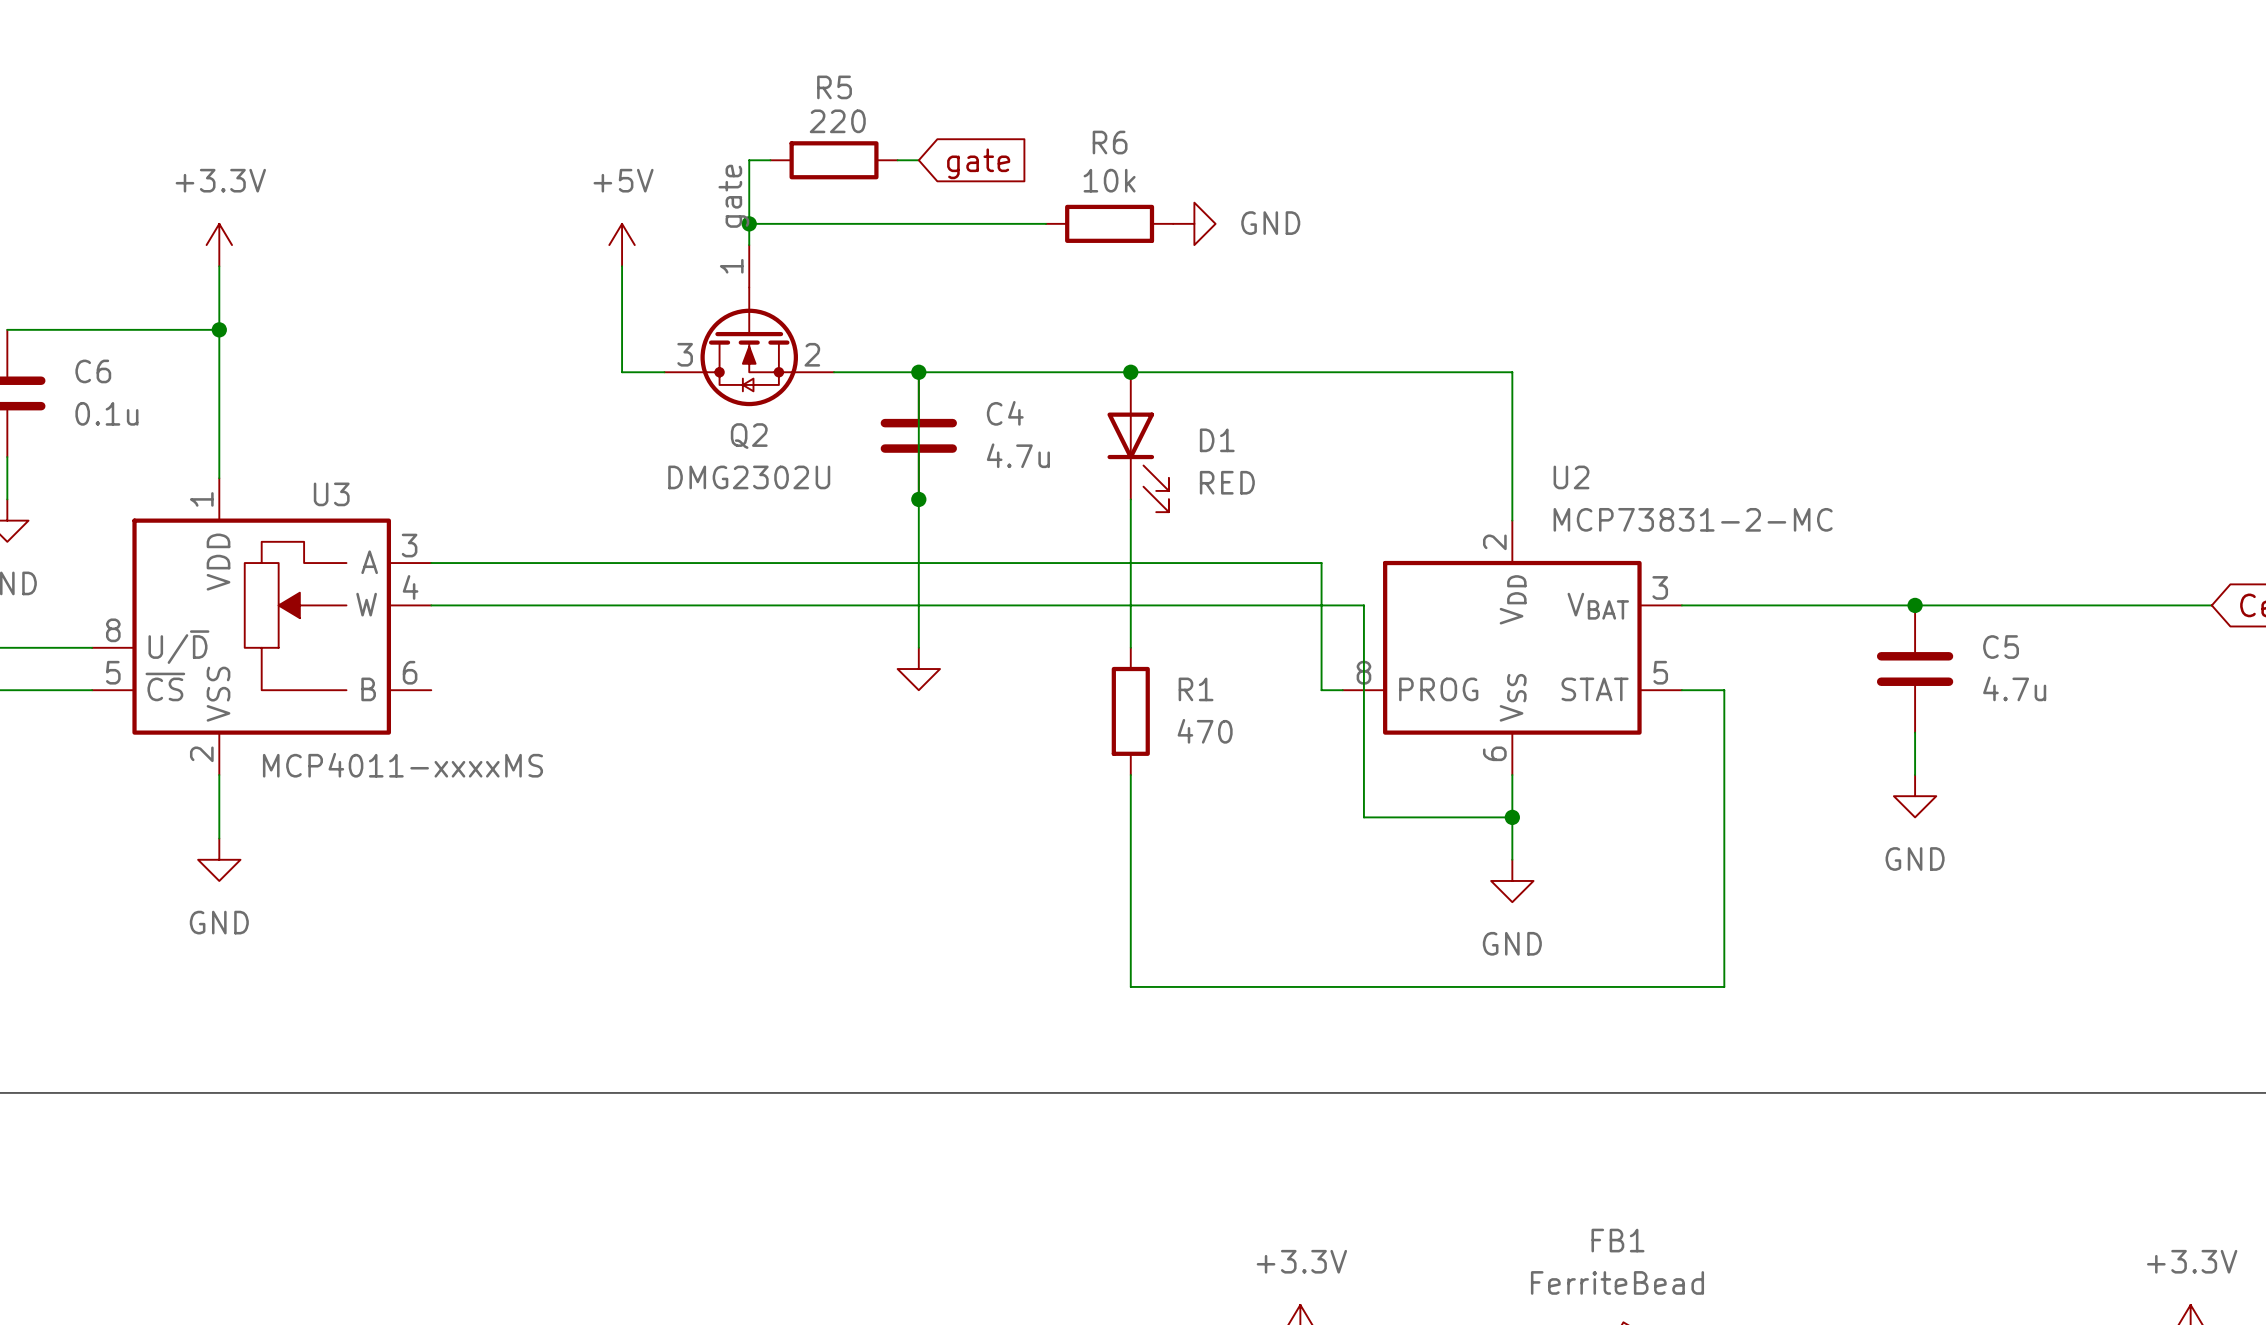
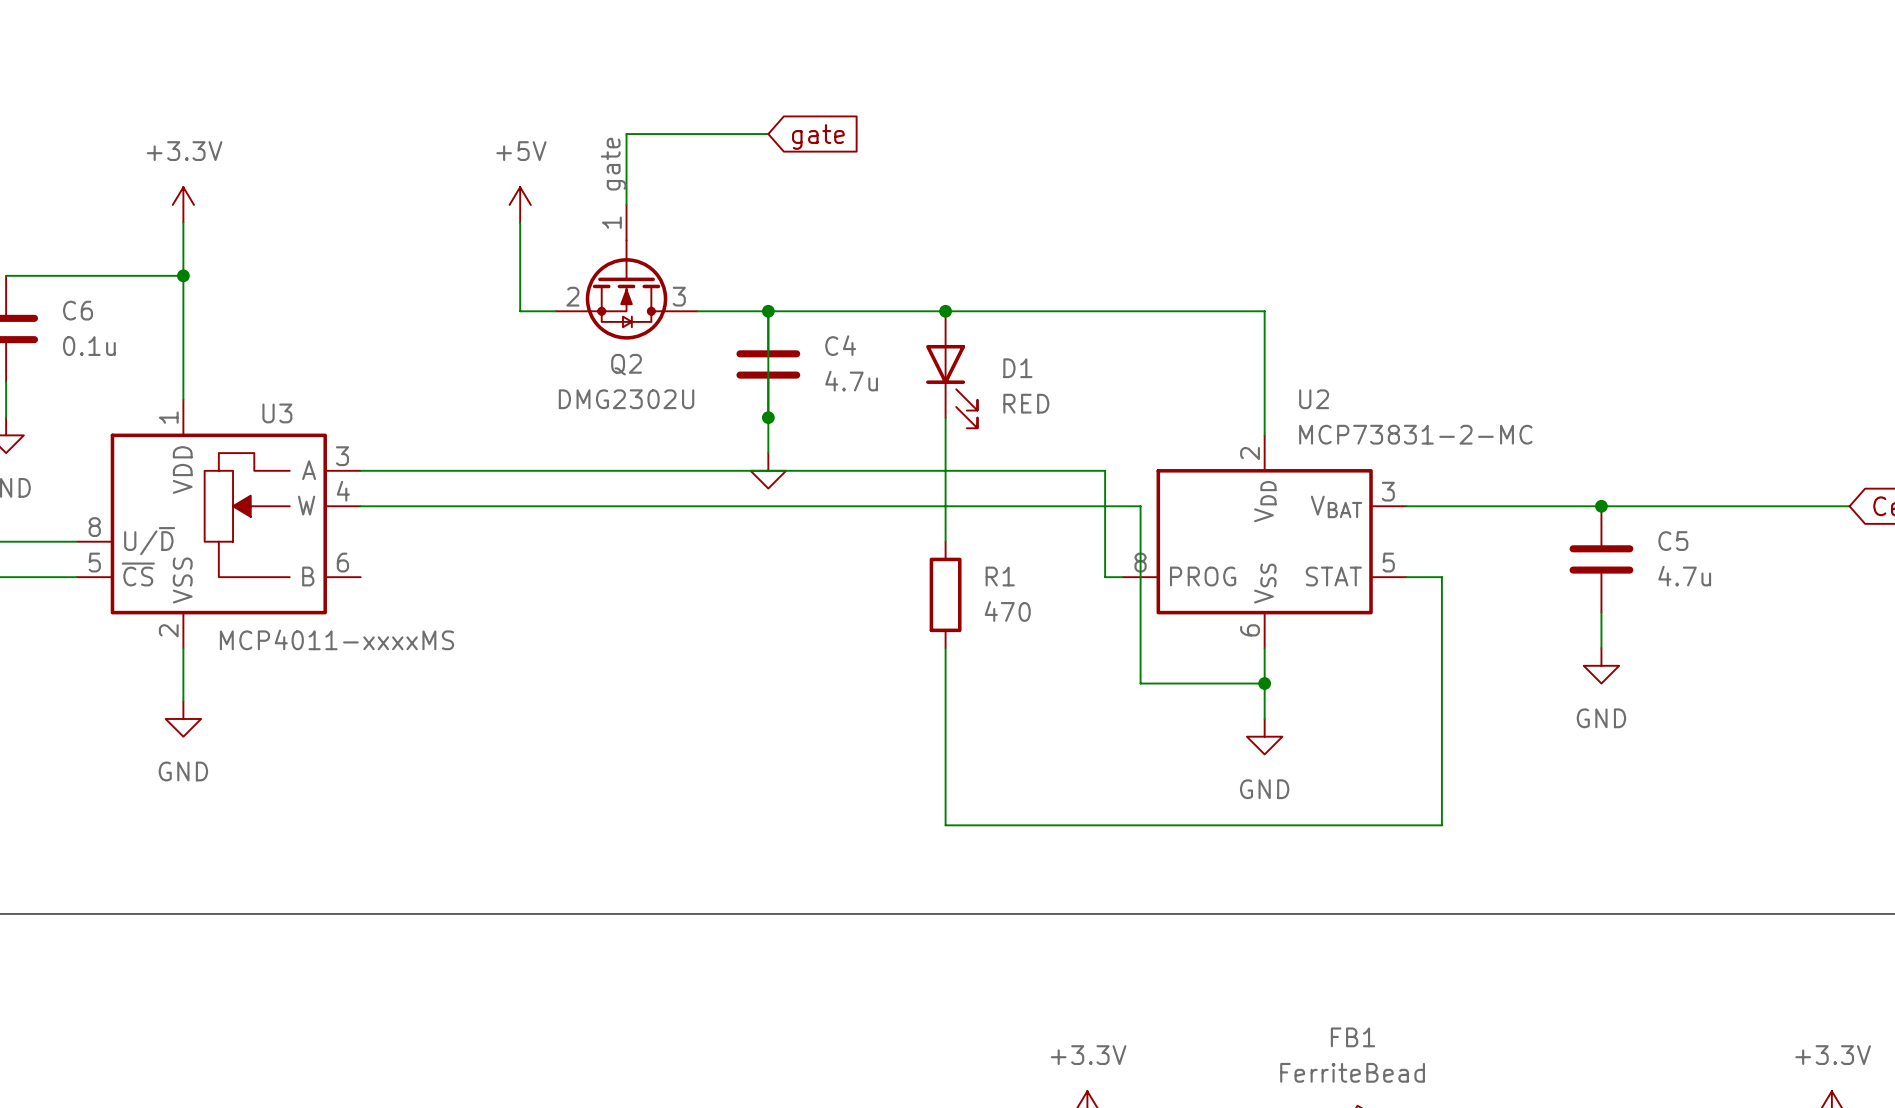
wire: none -> (644, 134) (750, 134)
R5: 220 (834, 160) -> none
wire: (749, 223) (1046, 223) -> none
junction: (749, 223) -> none
R6: 10k (1109, 223) -> none
power symbol: GND (1194, 223) -> none
Q2 flip: as is (749, 346) -> left-right (626, 290)
wire: (918, 541) (918, 647) -> none
power symbol position: (918, 669) -> (768, 470)

